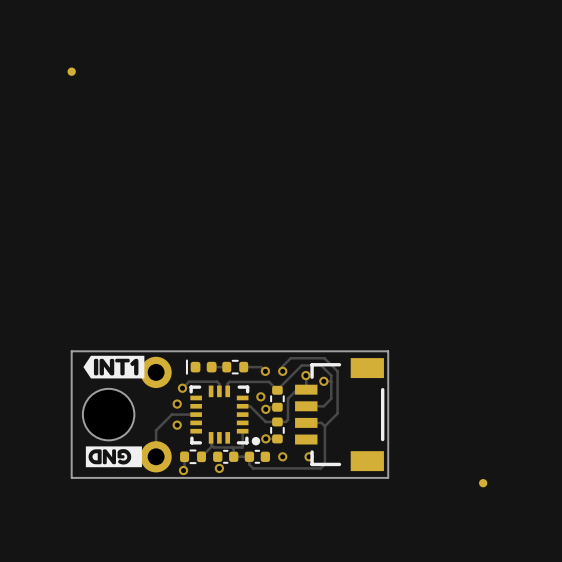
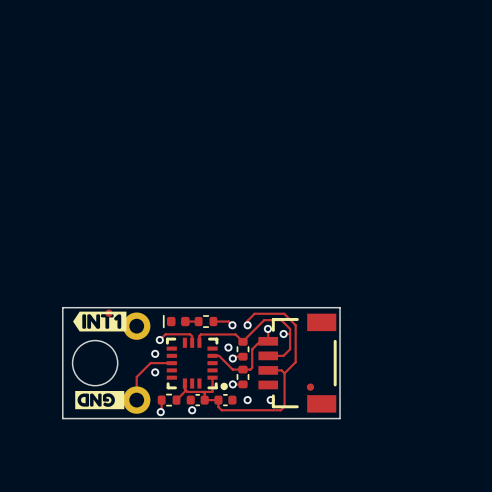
part: (71, 71) -> none
part: none -> (108, 313)
part position: (483, 483) -> (310, 387)

